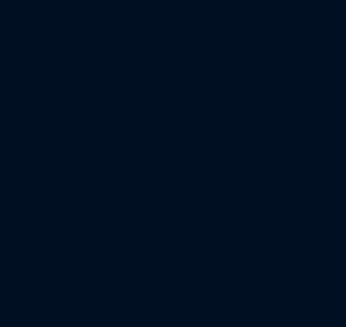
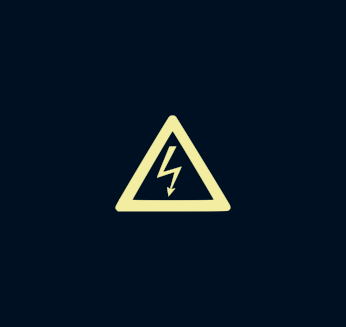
drawing: none -> [115, 115, 231, 212]

